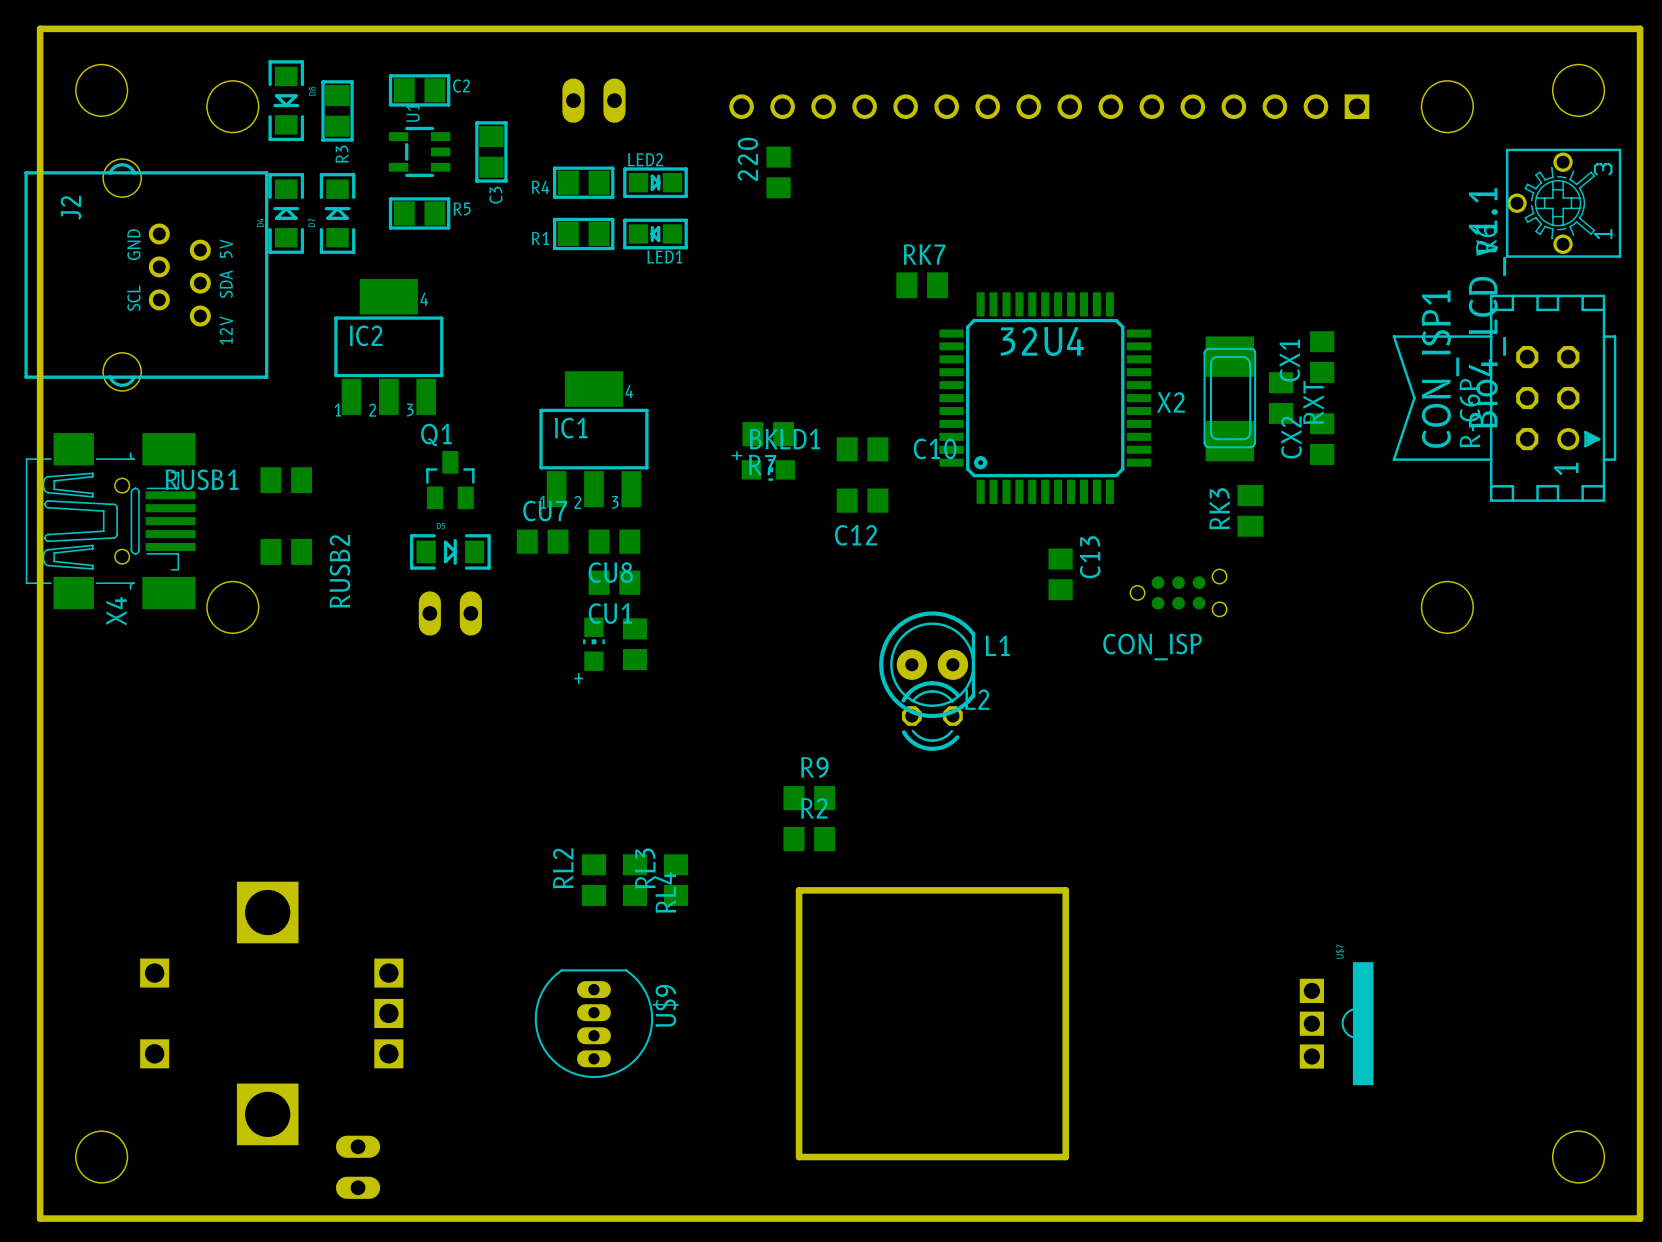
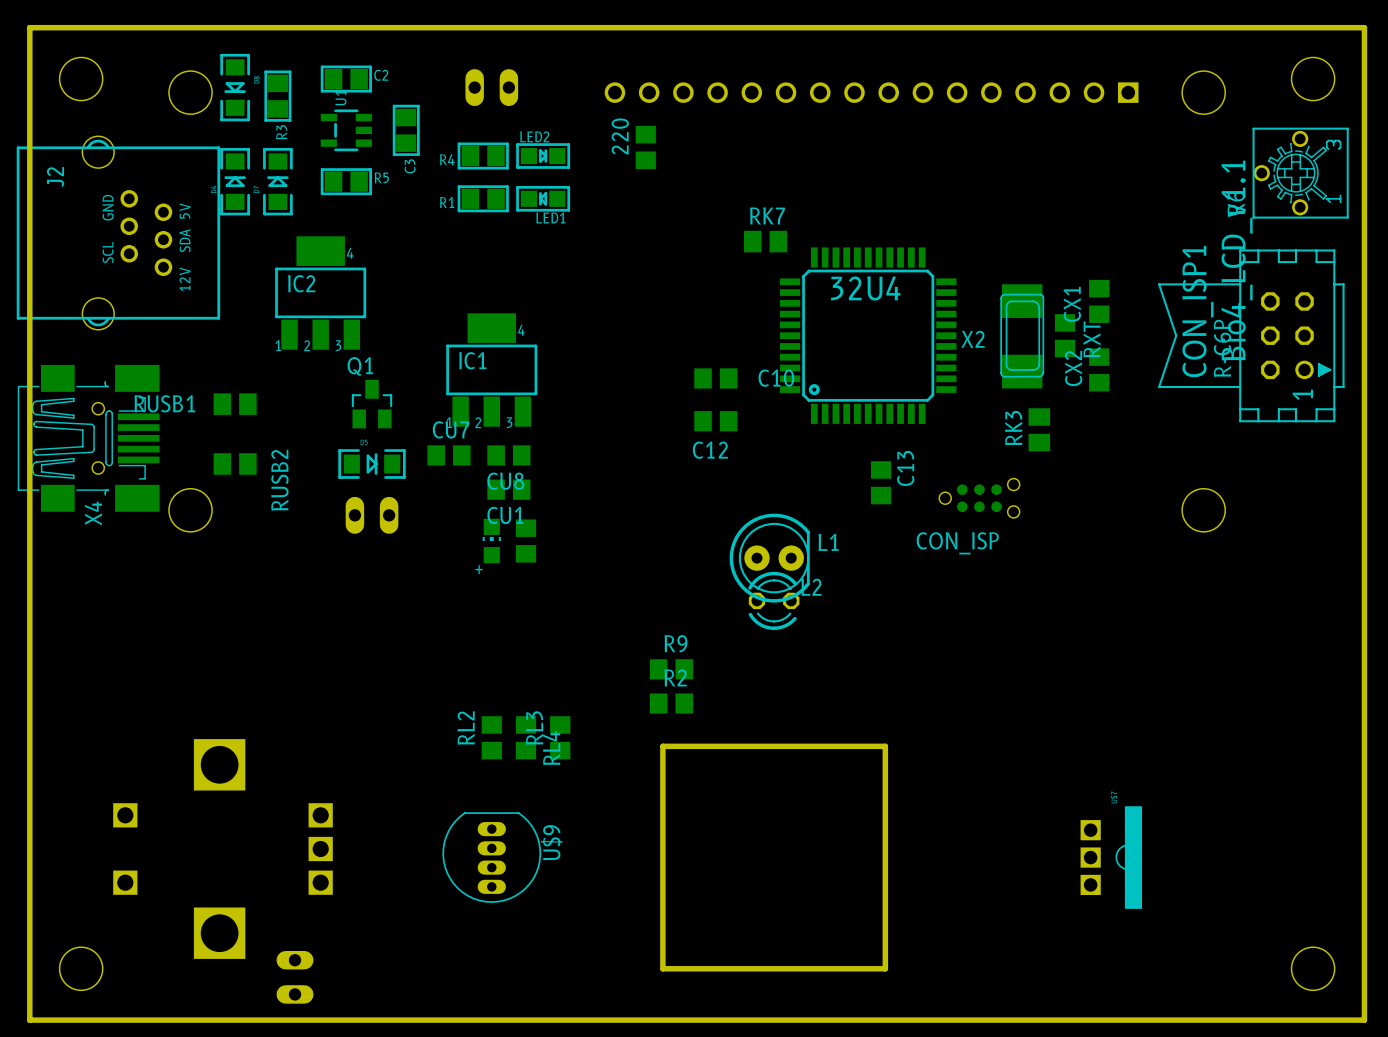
R7: (768, 434) -> none
BKLD1: (768, 469) -> none

